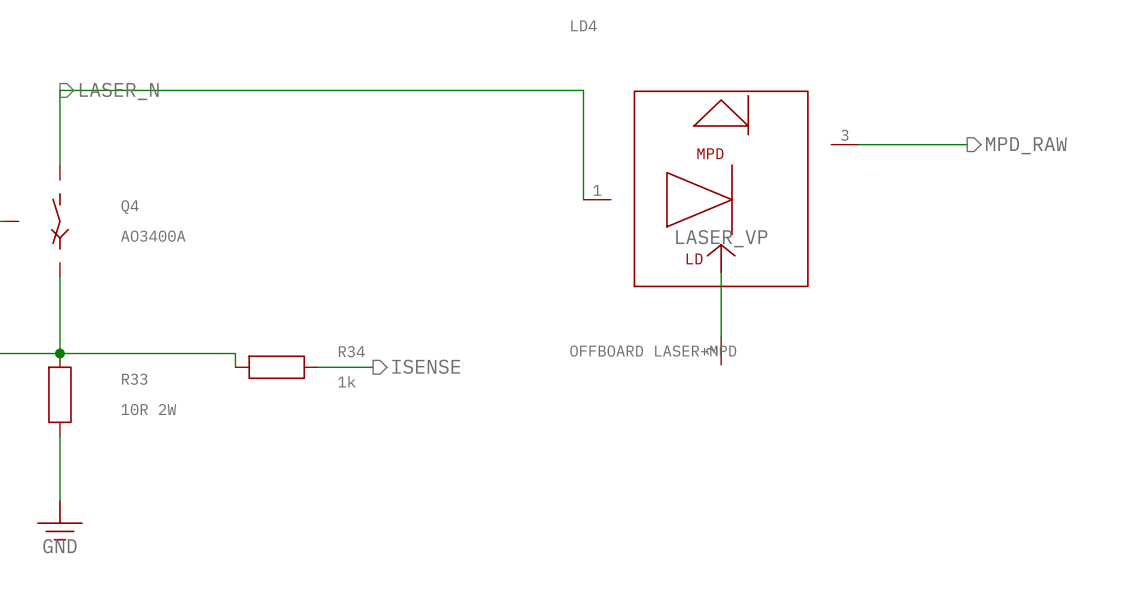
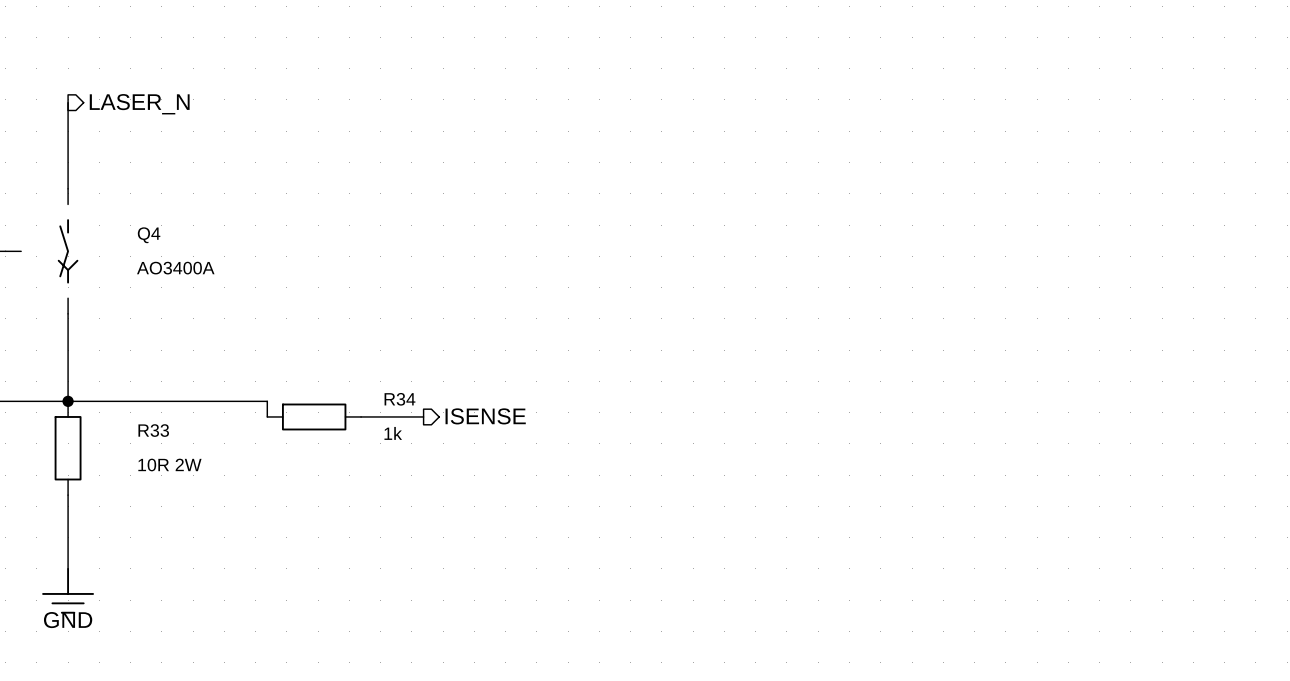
wire: (59, 90) (583, 90) (583, 199) -> none
wire: (858, 144) (967, 144) -> none
hierarchical label: MPD_RAW (1026, 145) -> none
LD4: OFFBOARD LASER+MPD (721, 227) -> none
power symbol: LASER_VP (721, 258) -> none
wire: (721, 272) (721, 337) -> none

